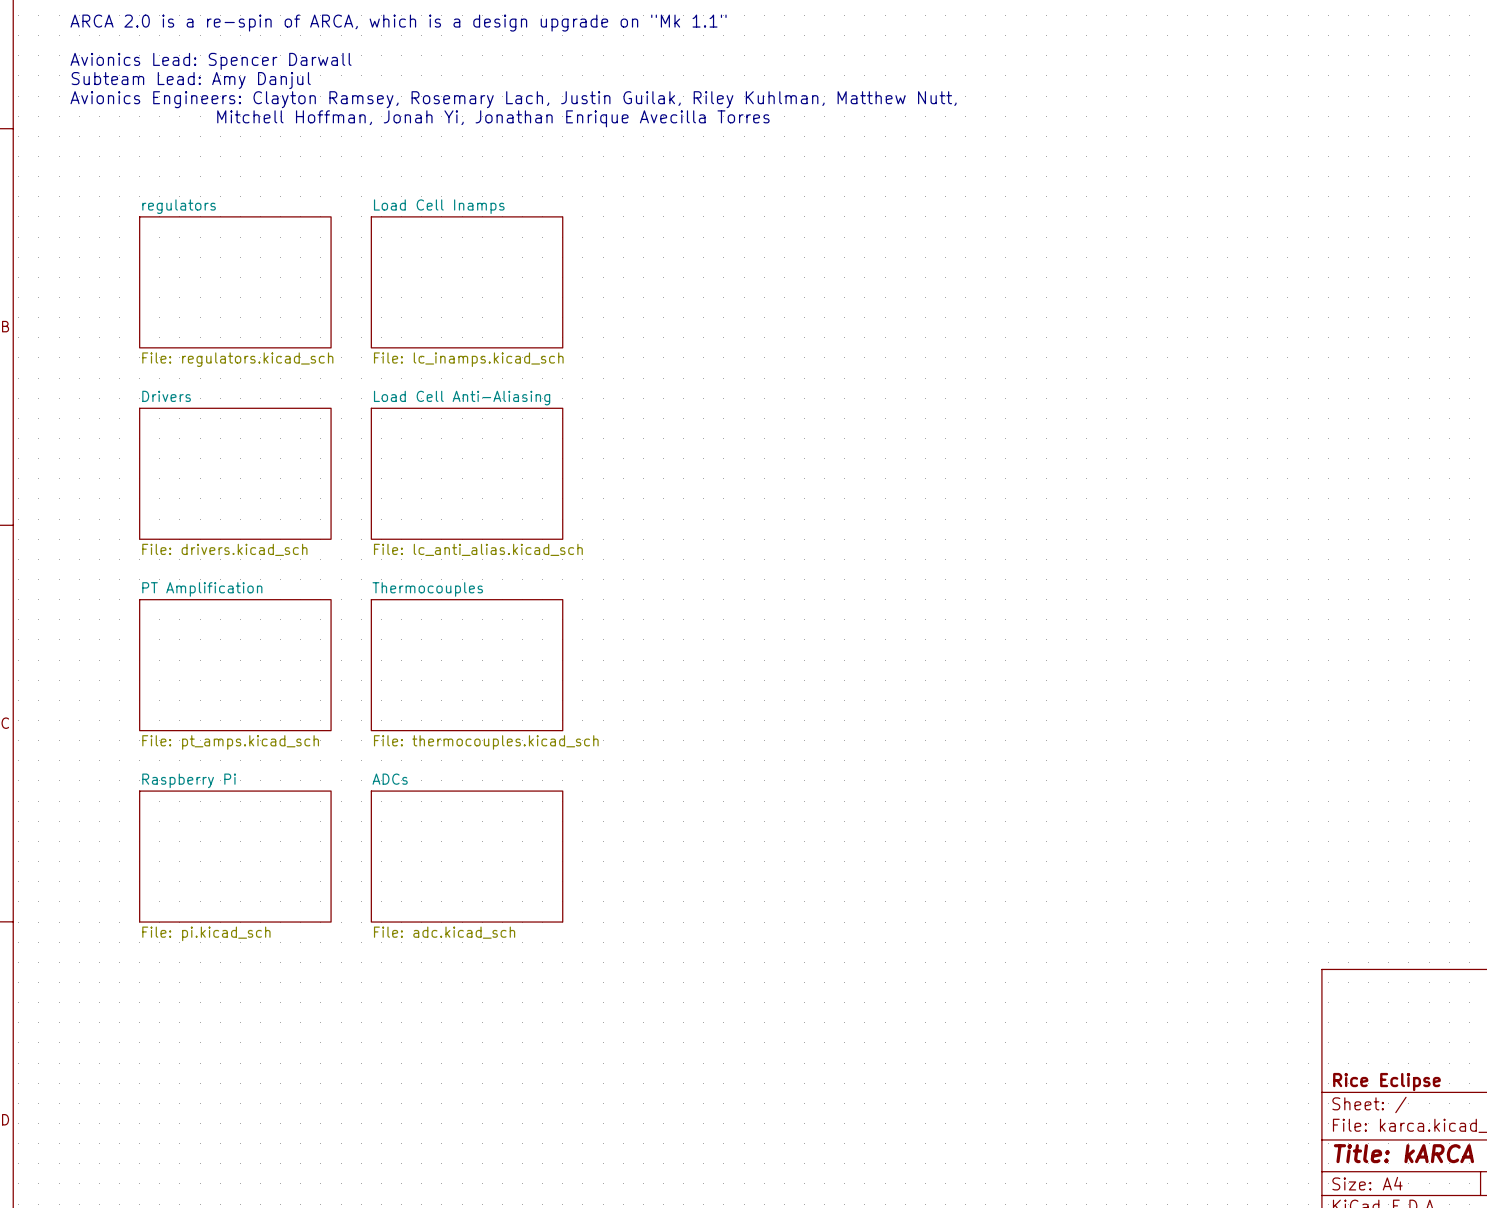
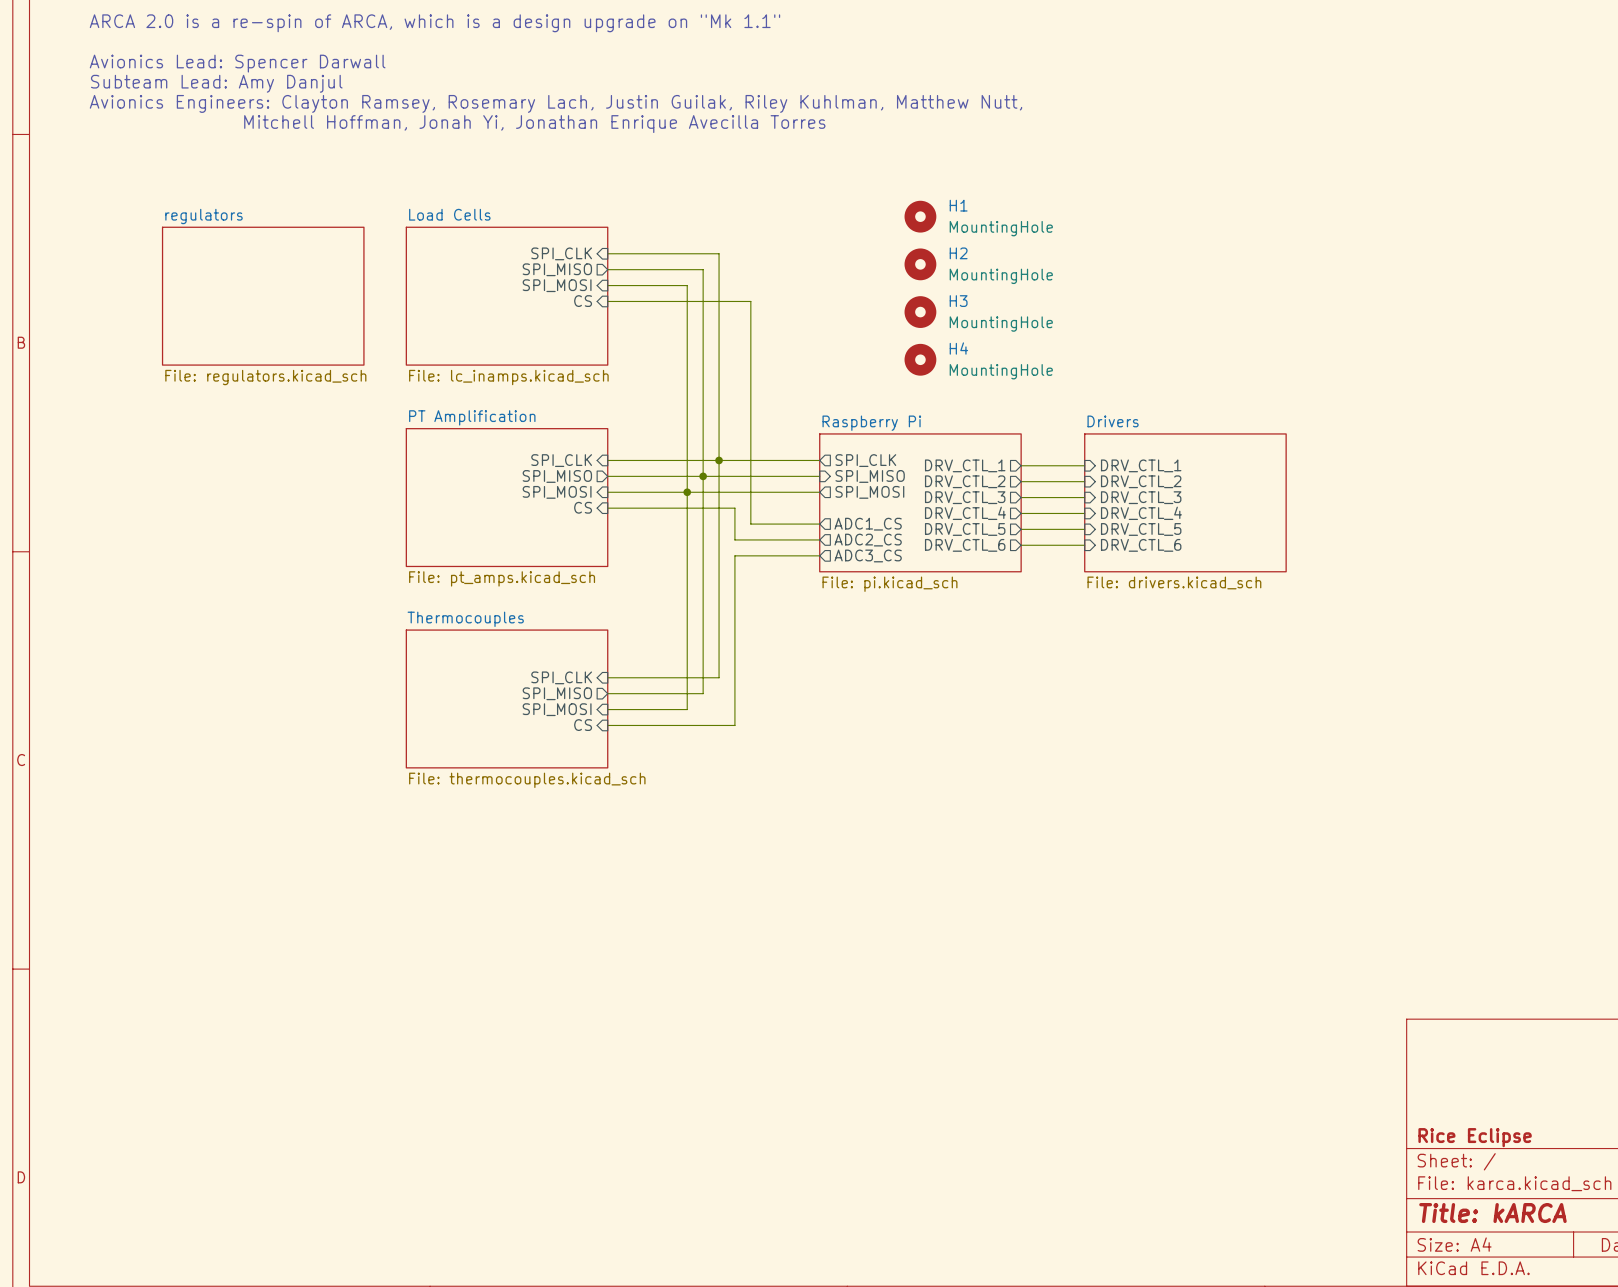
sheet Load Cell Inamps name: Load Cell Inamps (439, 206) -> Load Cells (449, 214)
H1: none -> MountingHole (920, 216)
sheet pin: none -> SPI_CLK (561, 253)
wire: none -> (607, 253) (719, 253) (719, 677) (607, 677)
H2: none -> MountingHole (920, 264)
sheet pin: none -> SPI_MISO (557, 269)
wire: none -> (607, 269) (703, 269) (703, 693) (607, 693)
sheet pin: none -> SPI_MOSI (557, 285)
wire: none -> (607, 285) (687, 285) (687, 709) (607, 709)
sheet pin: none -> CS (583, 301)
wire: none -> (607, 301) (750, 301) (750, 524) (819, 524)
H3: none -> MountingHole (920, 312)
H4: none -> MountingHole (920, 359)
sheet Load Cell Anti-Aliasing name: Load Cell Anti-Aliasing (462, 398) -> PT Amplification (472, 417)
sheet pin: none -> SPI_CLK (561, 460)
wire: none -> (607, 460) (819, 460)
junction: none -> (719, 460)
sheet pin: none -> SPI_CLK (865, 460)
sheet pin: none -> DRV_CTL_1 (965, 465)
wire: none -> (1021, 465) (1084, 465)
sheet pin: none -> DRV_CTL_1 (1141, 465)
sheet pin: none -> SPI_MISO (557, 476)
wire: none -> (607, 476) (819, 476)
junction: none -> (703, 476)
sheet pin: none -> SPI_MISO (870, 476)
sheet pin: none -> DRV_CTL_2 (965, 481)
wire: none -> (1021, 481) (1084, 481)
sheet pin: none -> DRV_CTL_2 (1141, 481)
sheet pin: none -> SPI_MOSI (557, 492)
wire: none -> (607, 492) (819, 492)
junction: none -> (687, 492)
sheet pin: none -> SPI_MOSI (869, 492)
sheet Drivers: File: drivers.kicad_sch (235, 473) -> none
sheet pin: none -> DRV_CTL_3 (965, 497)
wire: none -> (1021, 497) (1084, 497)
sheet pin: none -> DRV_CTL_3 (1141, 497)
sheet Raspberry Pi: none -> File: pi.kicad_sch (920, 502)
sheet Drivers: none -> File: drivers.kicad_sch (1185, 502)
sheet pin: none -> CS (583, 507)
wire: none -> (607, 508) (734, 508) (734, 539) (819, 539)
sheet pin: none -> DRV_CTL_4 (965, 513)
wire: none -> (1021, 513) (1084, 513)
sheet pin: none -> DRV_CTL_4 (1141, 513)
sheet pin: none -> ADC1_CS (868, 524)
wire: none -> (1021, 529) (1084, 529)
sheet pin: none -> DRV_CTL_5 (965, 529)
sheet pin: none -> DRV_CTL_5 (1141, 529)
sheet pin: none -> ADC2_CS (868, 540)
sheet pin: none -> DRV_CTL_6 (965, 545)
wire: none -> (1021, 545) (1084, 545)
sheet pin: none -> DRV_CTL_6 (1141, 545)
wire: none -> (819, 555) (734, 555) (734, 725) (607, 725)
sheet pin: none -> ADC3_CS (868, 555)
sheet Load Cell Anti-Aliasing value: File: lc_anti_alias.kicad_sch (478, 549) -> File: pt_amps.kicad_sch (502, 578)
sheet pin: none -> SPI_CLK (561, 677)
sheet pin: none -> SPI_MISO (557, 693)
sheet PT Amplification: File: pt_amps.kicad_sch (235, 665) -> none
sheet pin: none -> SPI_MOSI (557, 709)
sheet pin: none -> CS (583, 725)
sheet Raspberry Pi: File: pi.kicad_sch (235, 856) -> none
sheet ADCs: File: adc.kicad_sch (467, 856) -> none

